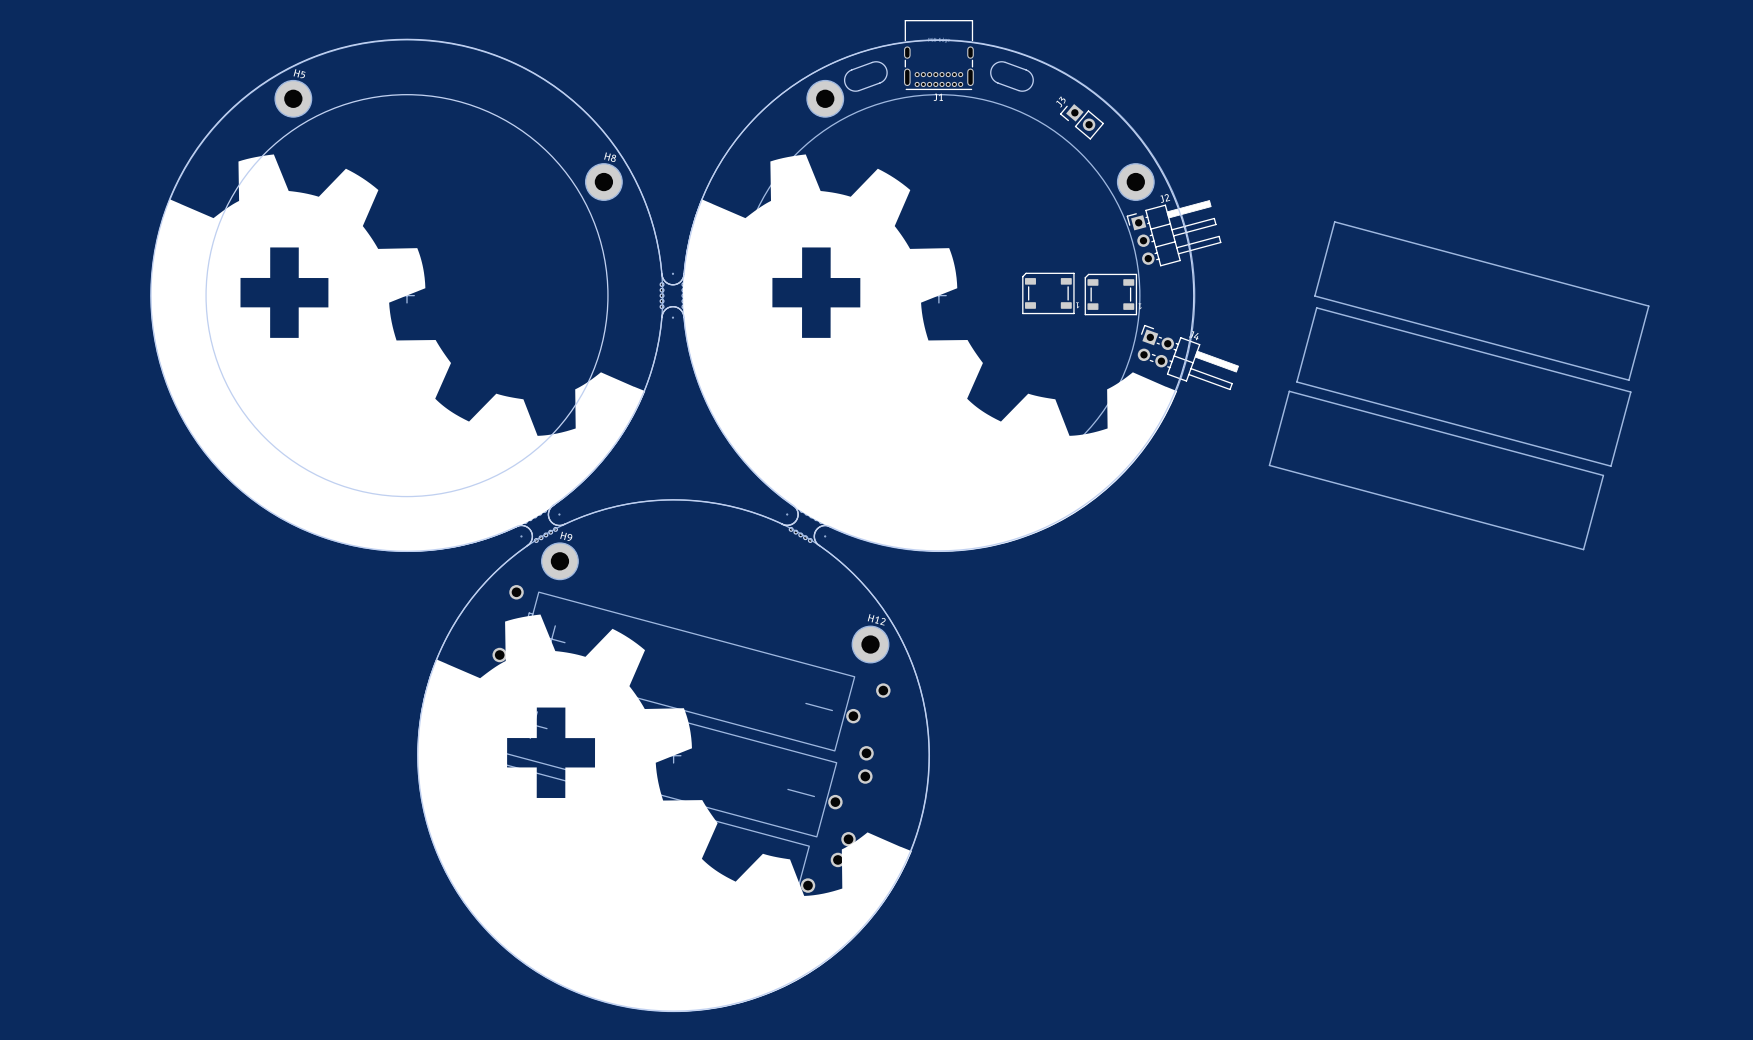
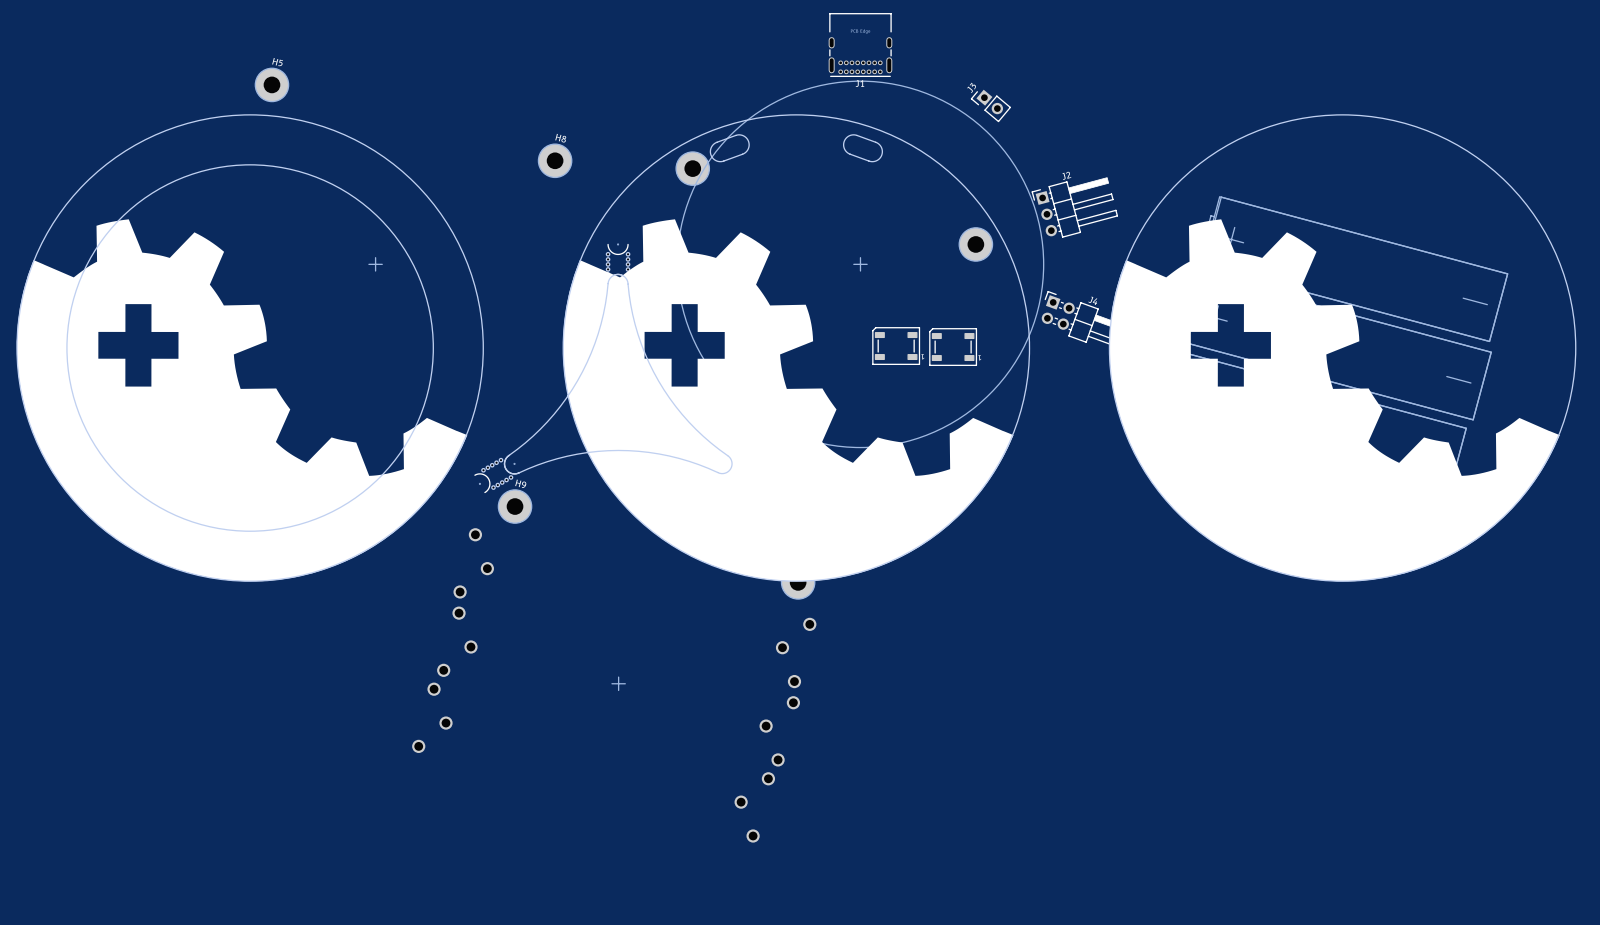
drawing: [151, 39, 1195, 1012] -> none
drawing position: (865, 76) -> (729, 148)
drawing position: (1012, 76) -> (862, 148)
part: (825, 98) -> none
round board edge: none -> [16, 114, 484, 582]
round board edge: none -> [563, 114, 1030, 582]
round board edge: none -> [1109, 114, 1576, 582]
part: (1135, 182) -> none
part: none -> (692, 168)
drawing: none -> [1109, 196, 1560, 582]
drawing: none -> [16, 219, 468, 582]
drawing: none -> [563, 219, 1014, 582]
part: none -> (975, 244)
board edge: (684, 274) (681, 280) (675, 284) (668, 284) (663, 279) (651, 219) (634, 178) (610, 140) (571, 99) (525, 68) (484, 51) (440, 41) (396, 39) (340, 48) (298, 63) (260, 85) (225, 114) (190, 157) (170, 197) (154, 251) (150, 295) (153, 329) (159, 362) (170, 393) (185, 424) (218, 468) (243, 492) (270, 511) (299, 527) (331, 539) (385, 550) (441, 548) (485, 538) (519, 525) (525, 526) (530, 529) (532, 535) (529, 543) (493, 573) (464, 607) (447, 636) (429, 677) (420, 721) (417, 754) (421, 799) (429, 831) (441, 862) (463, 901) (484, 927) (517, 958) (545, 976) (585, 995) (628, 1007) (673, 1011) (717, 1007) (750, 999) (791, 982) (820, 964) (846, 943) (876, 910) (900, 873) (917, 831) (927, 788) (929, 754) (925, 710) (917, 677) (899, 636) (882, 607) (853, 573) (817, 543) (814, 536) (816, 530) (821, 526) (827, 525) (860, 538) (904, 548) (959, 550) (992, 545) (1025, 535) (1075, 511) (1118, 476) (1140, 451) (1159, 423) (1174, 393) (1184, 362) (1191, 329) (1193, 295) (1187, 240) (1174, 198) (1153, 158) (1126, 123) (1084, 86) (1046, 64) (993, 46) (949, 40) (904, 42) (850, 55) (810, 74) (773, 100) (742, 131) (711, 178) (691, 230) (684, 274) -> none
part: (1048, 293) -> none
part: (1110, 294) -> none
round board edge position: (407, 295) -> (250, 348)
part: none -> (896, 346)
part: none -> (953, 347)

